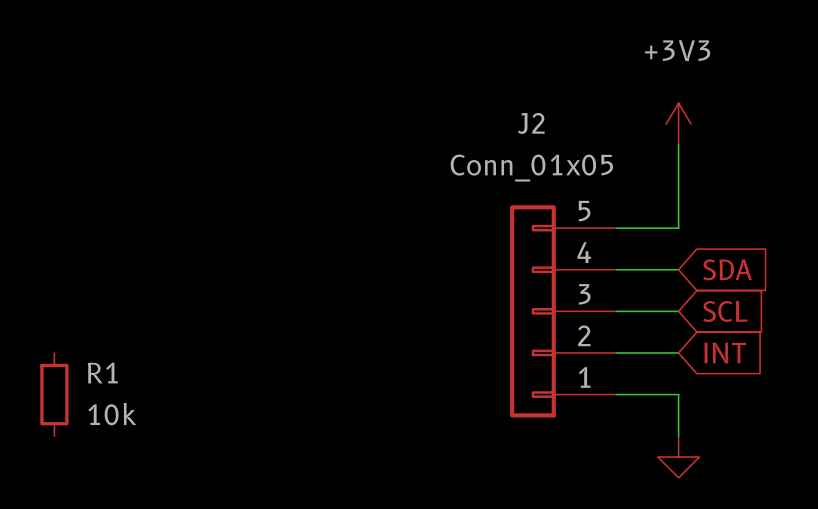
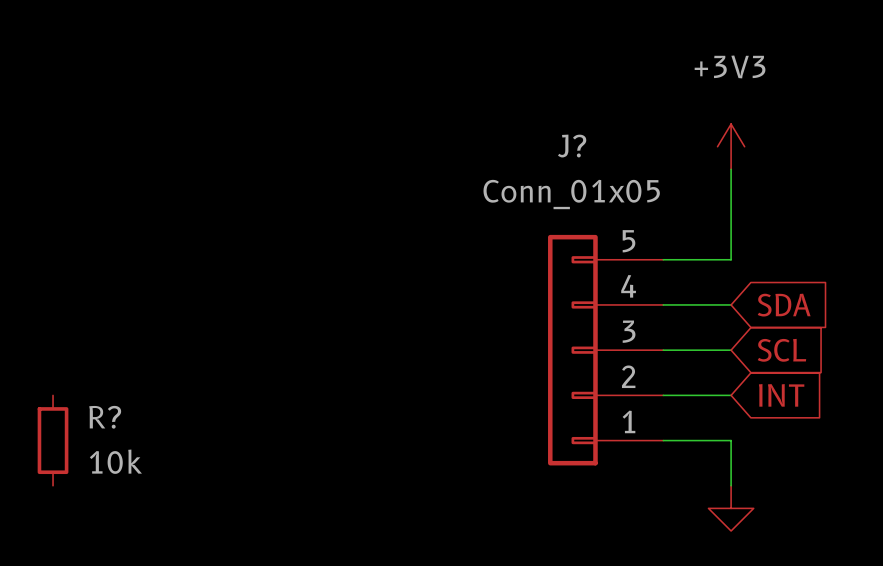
J2 name: J2 (531, 123) -> J? (572, 146)
R1 name: R1 (102, 373) -> R? (105, 417)

